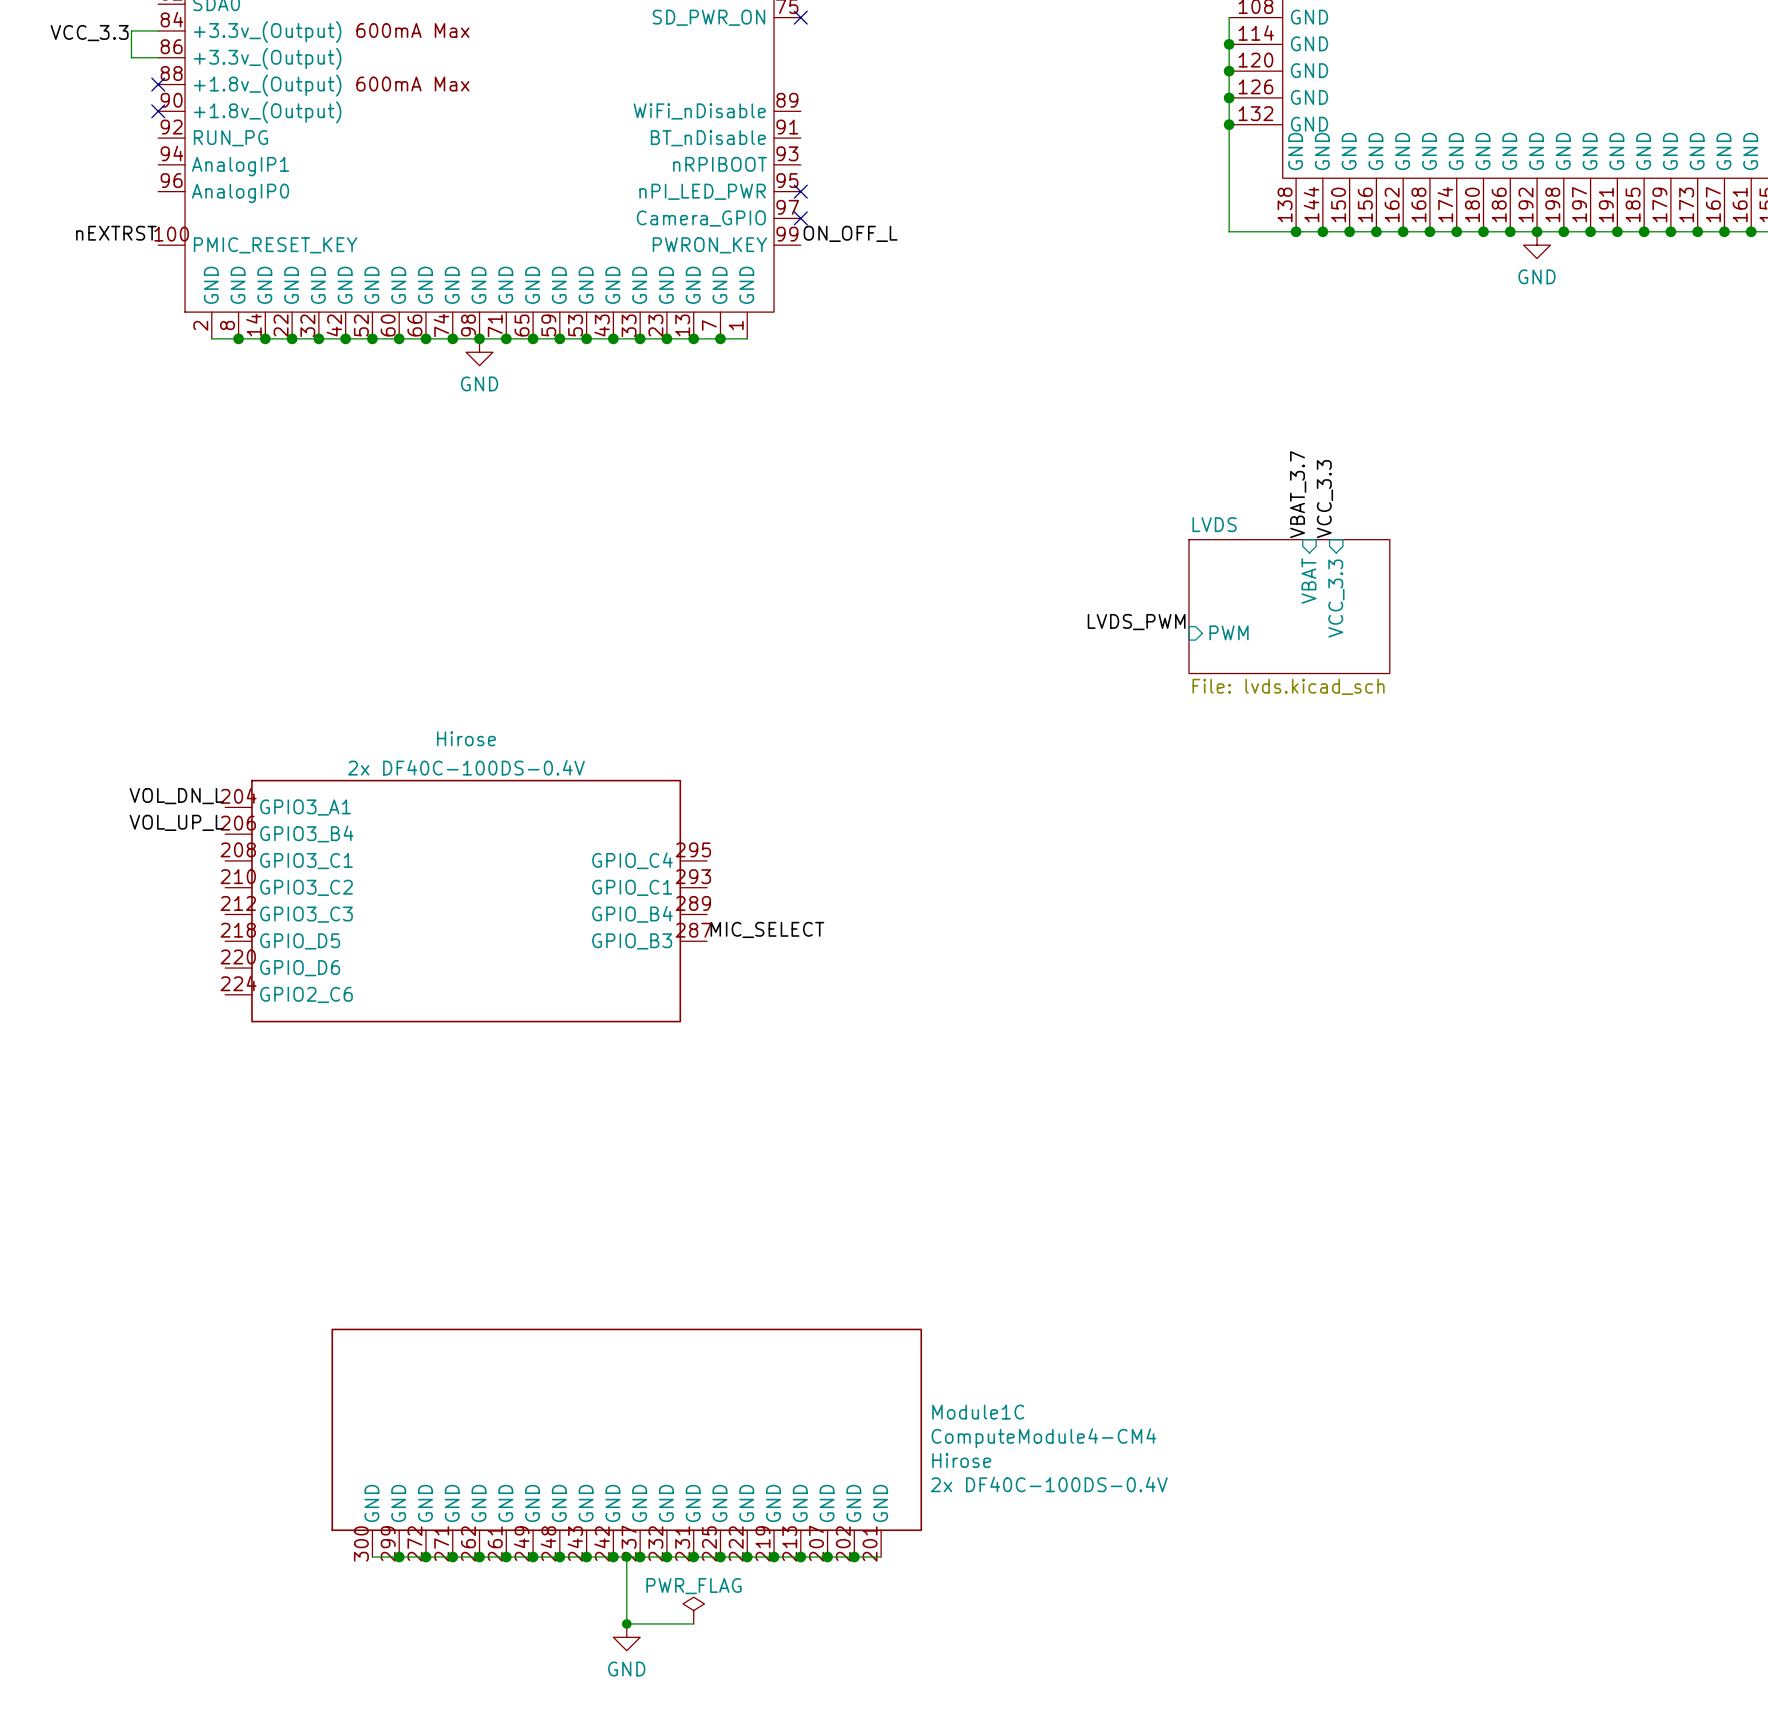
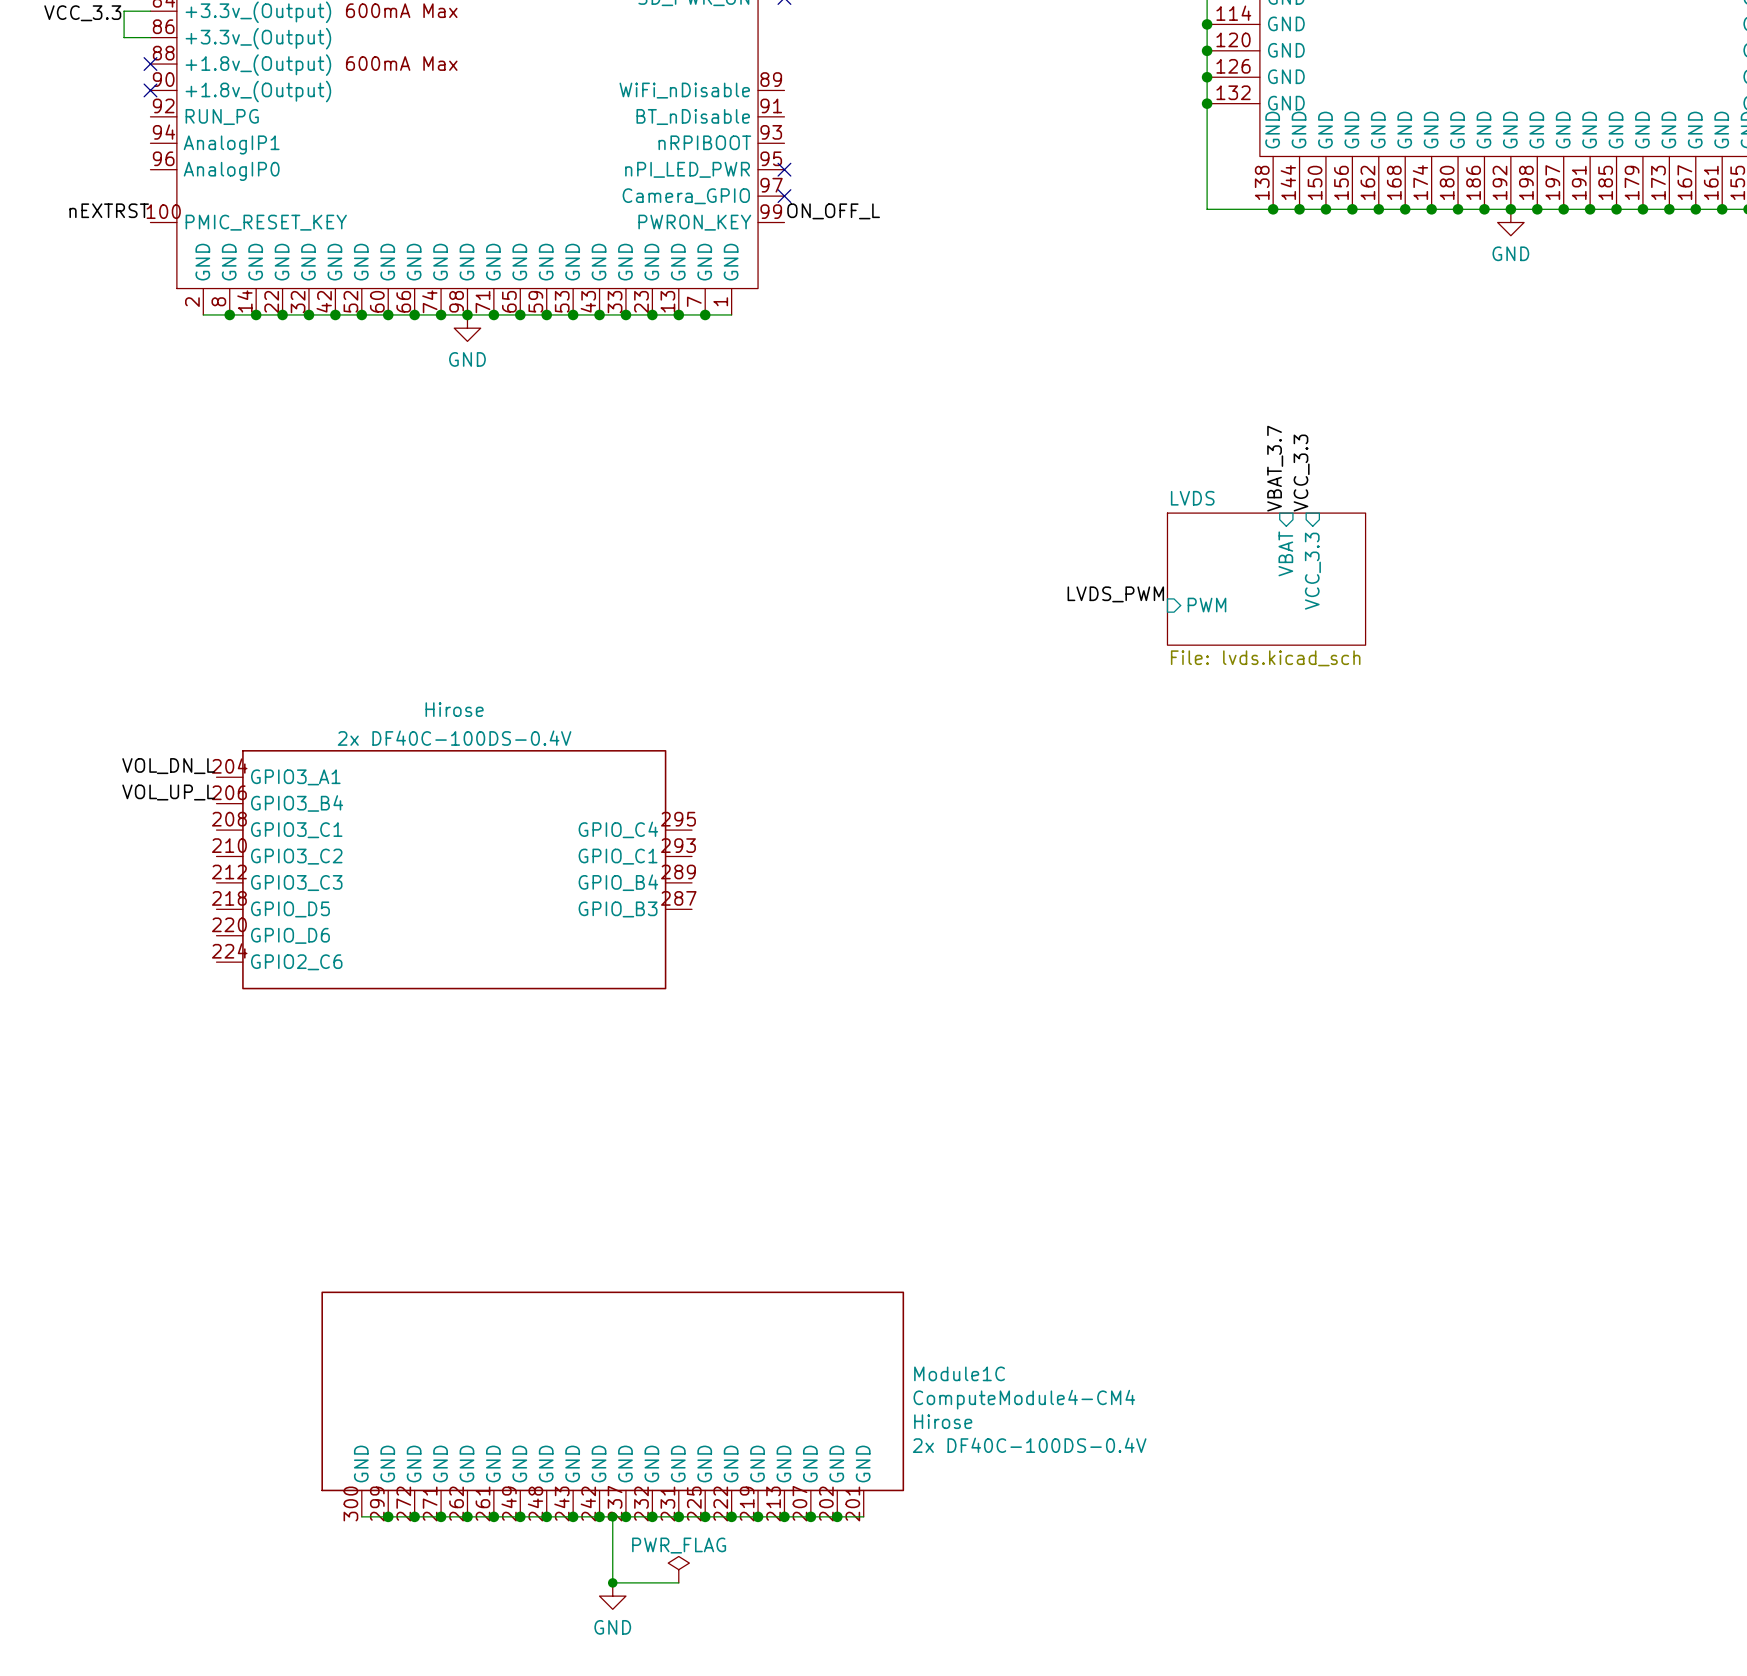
label: MIC_SELECT (767, 929) -> none

